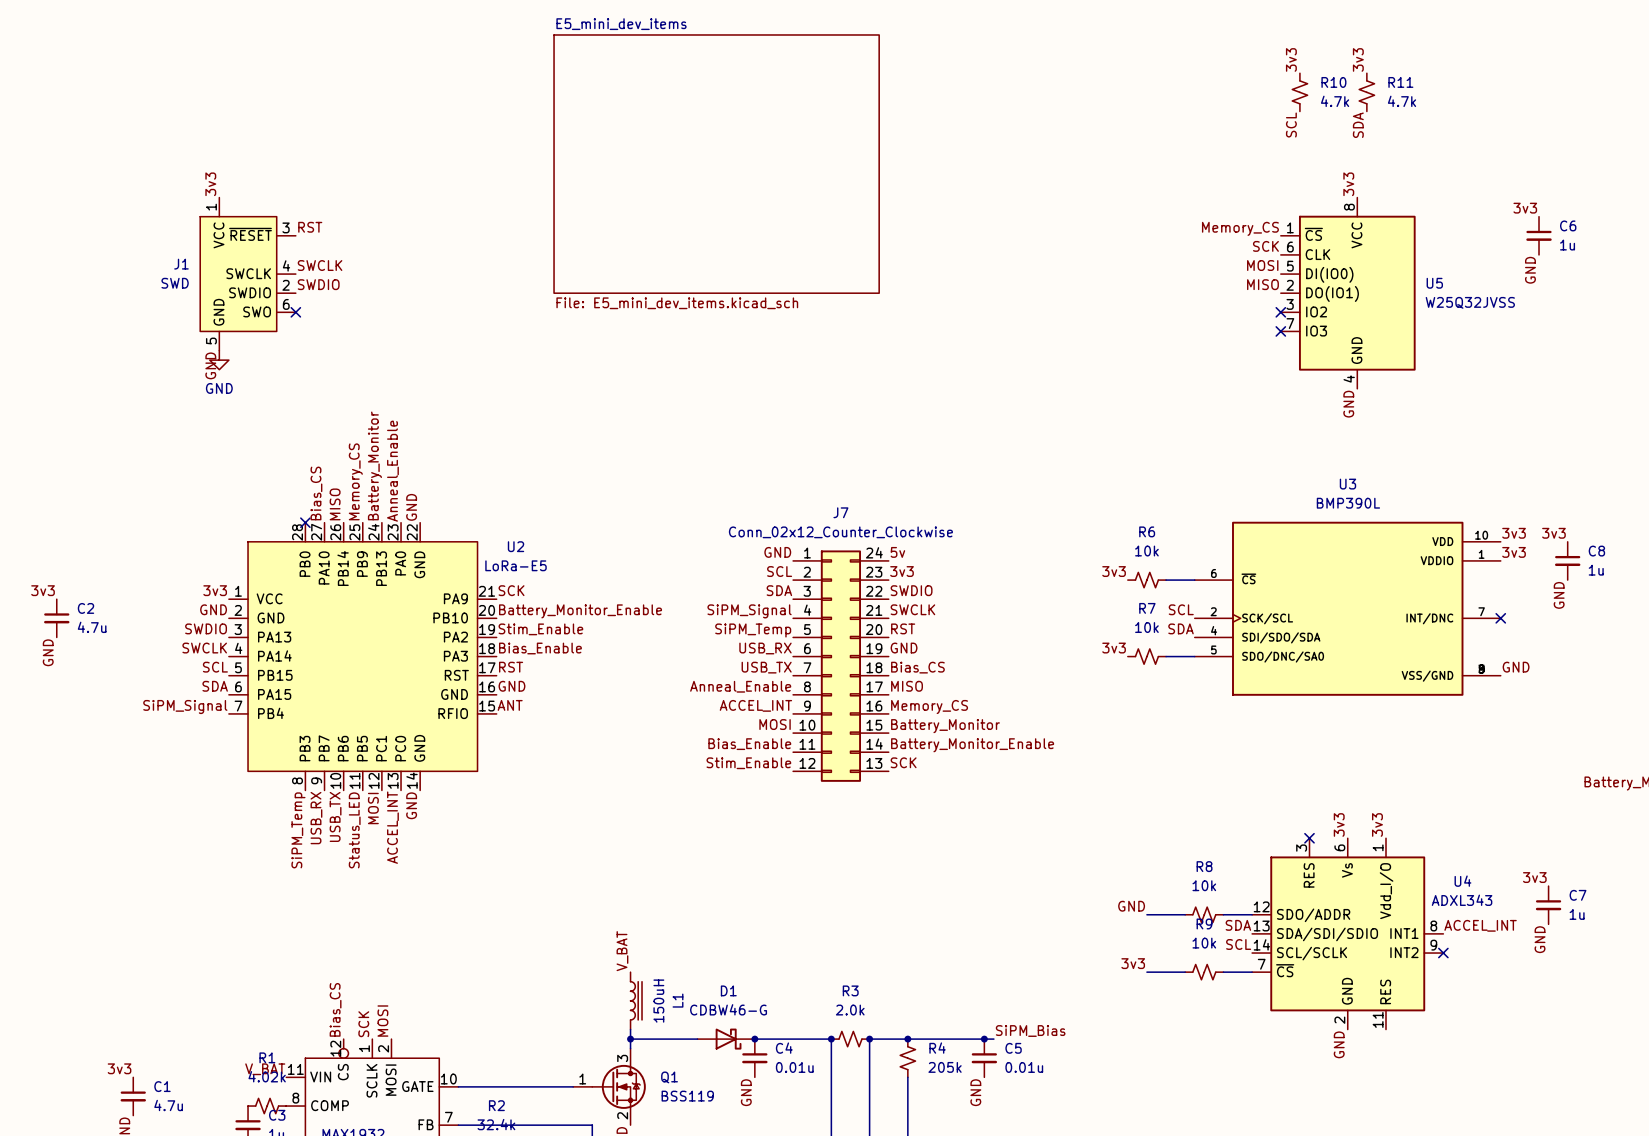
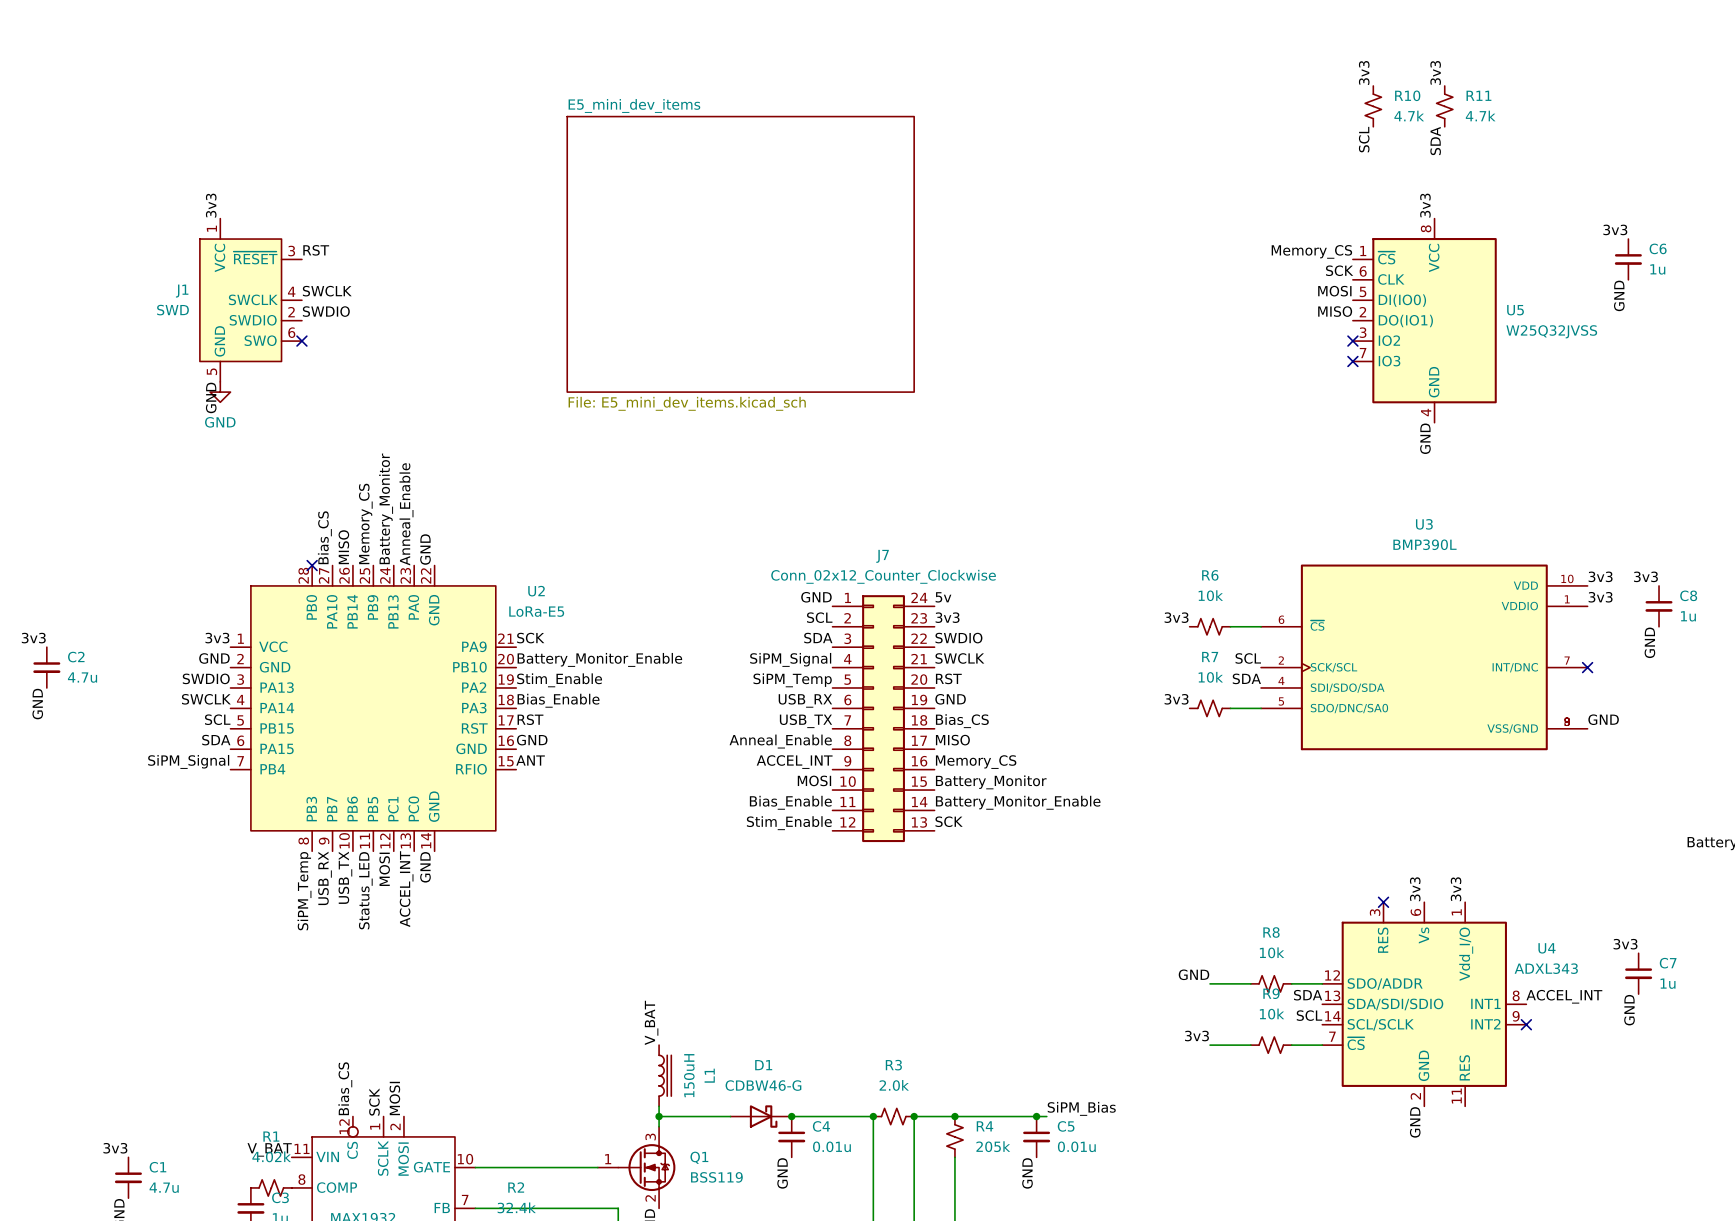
sheet E5_mini_dev_items position: (716, 164) -> (740, 254)

